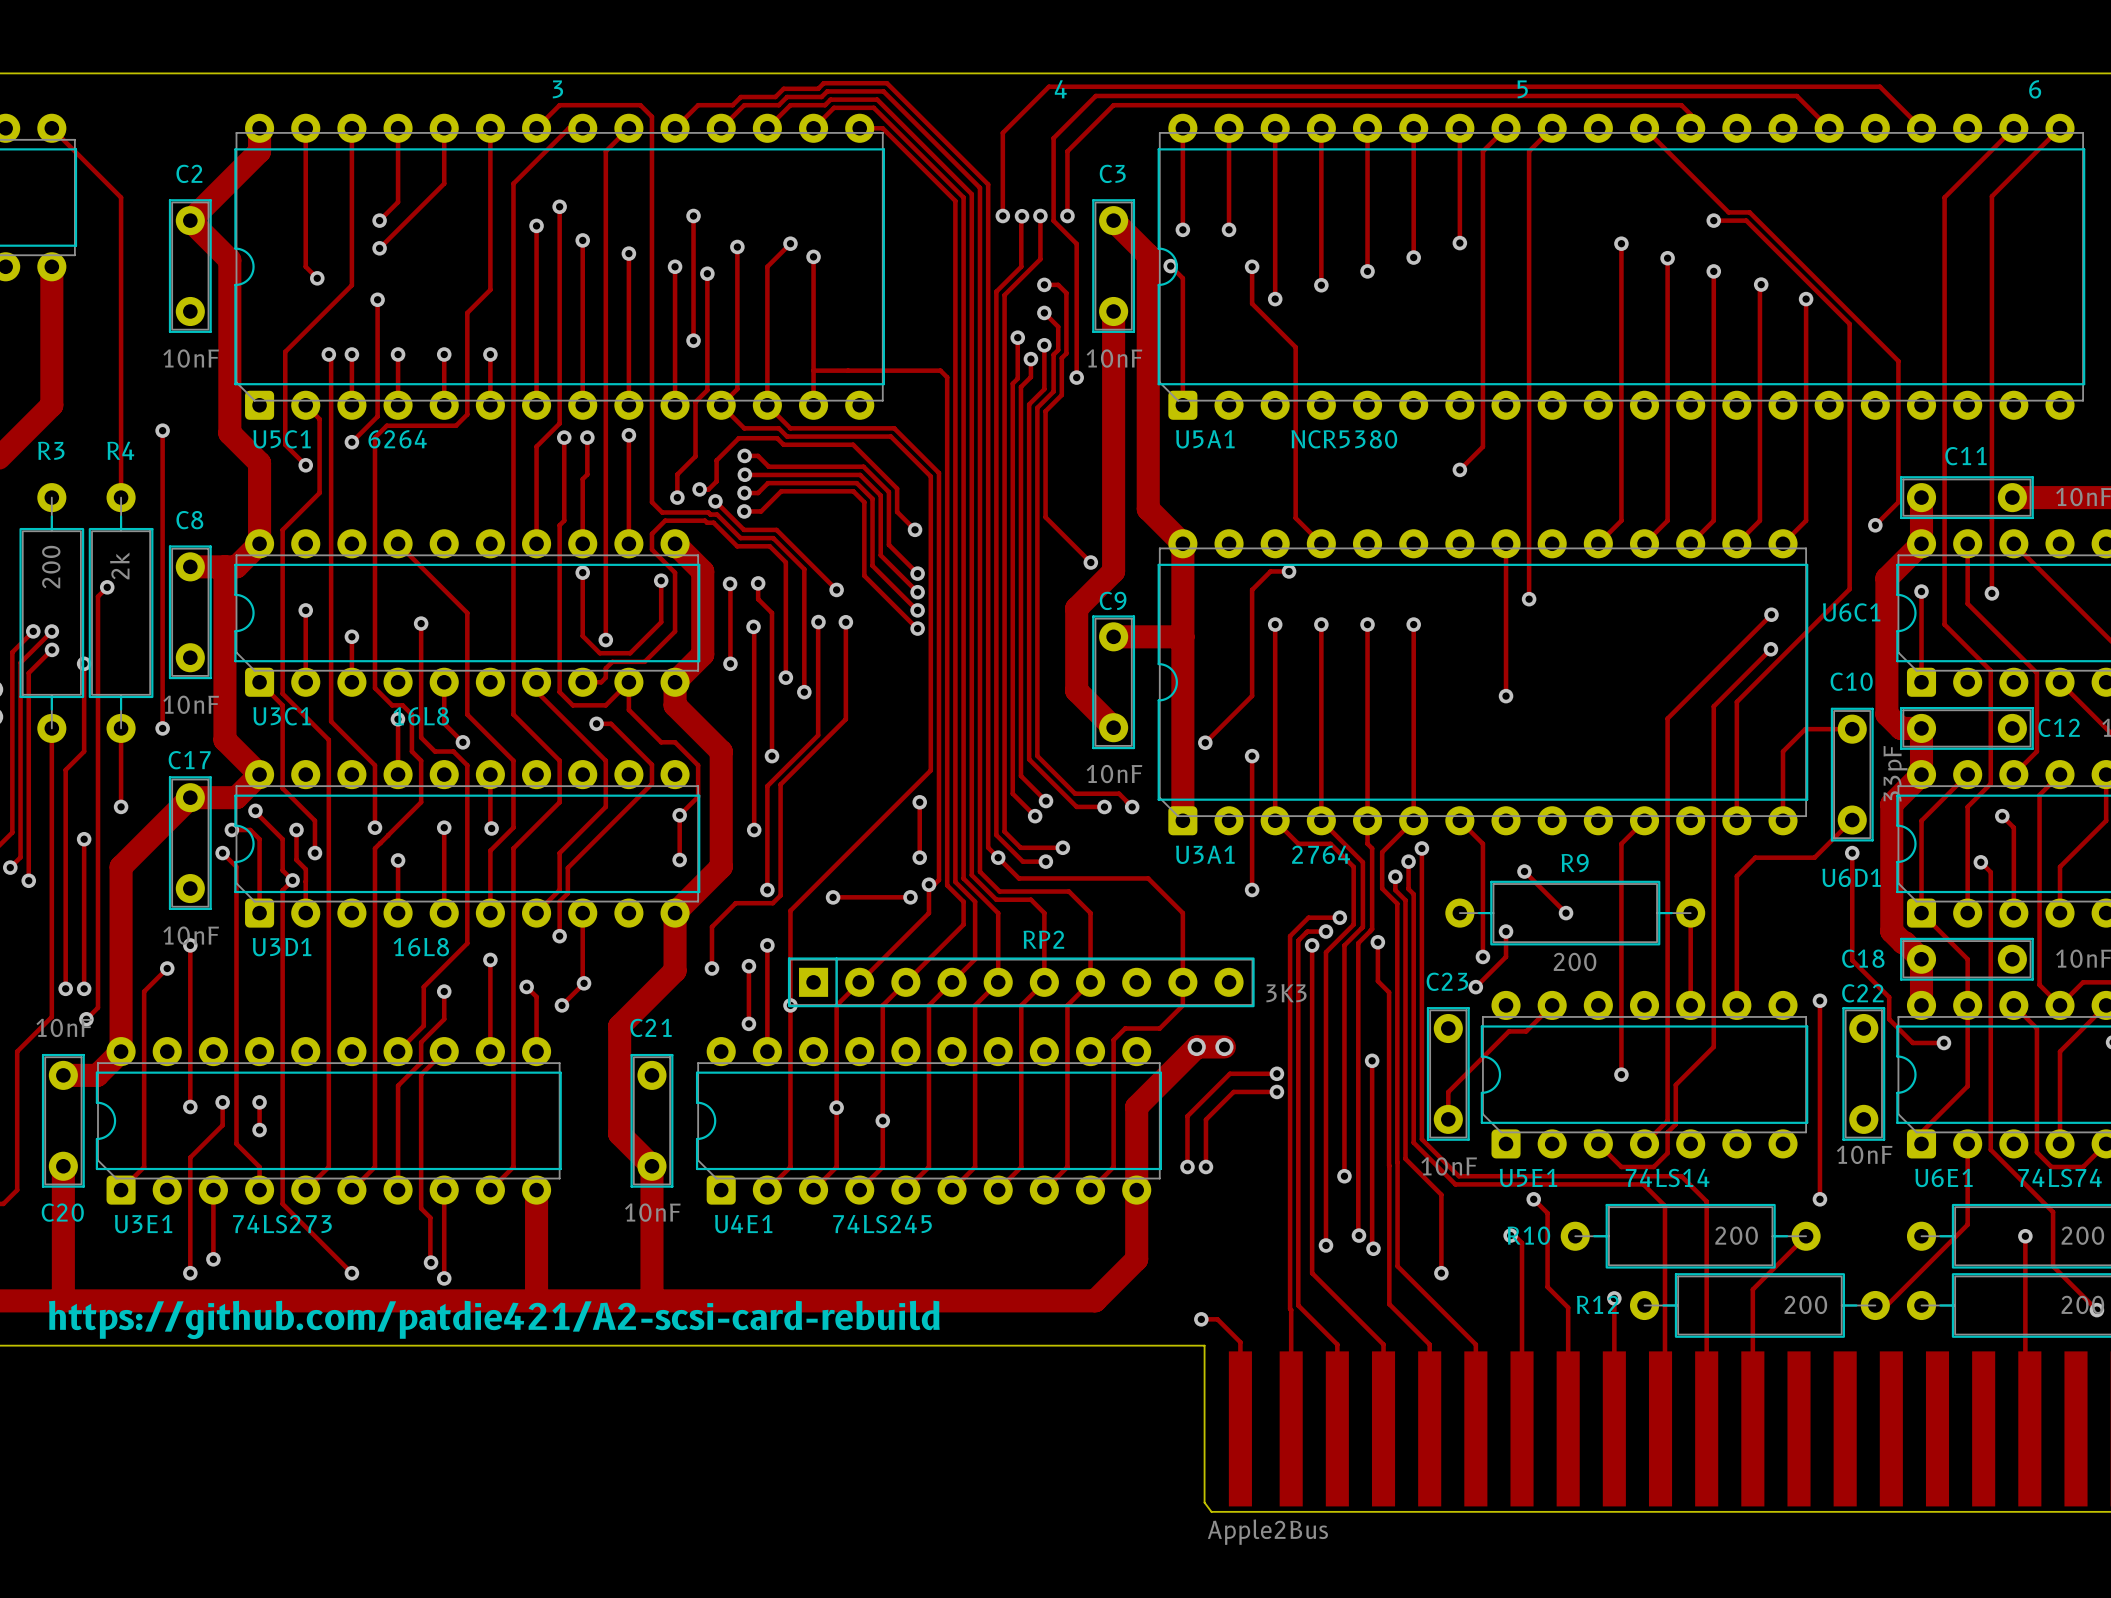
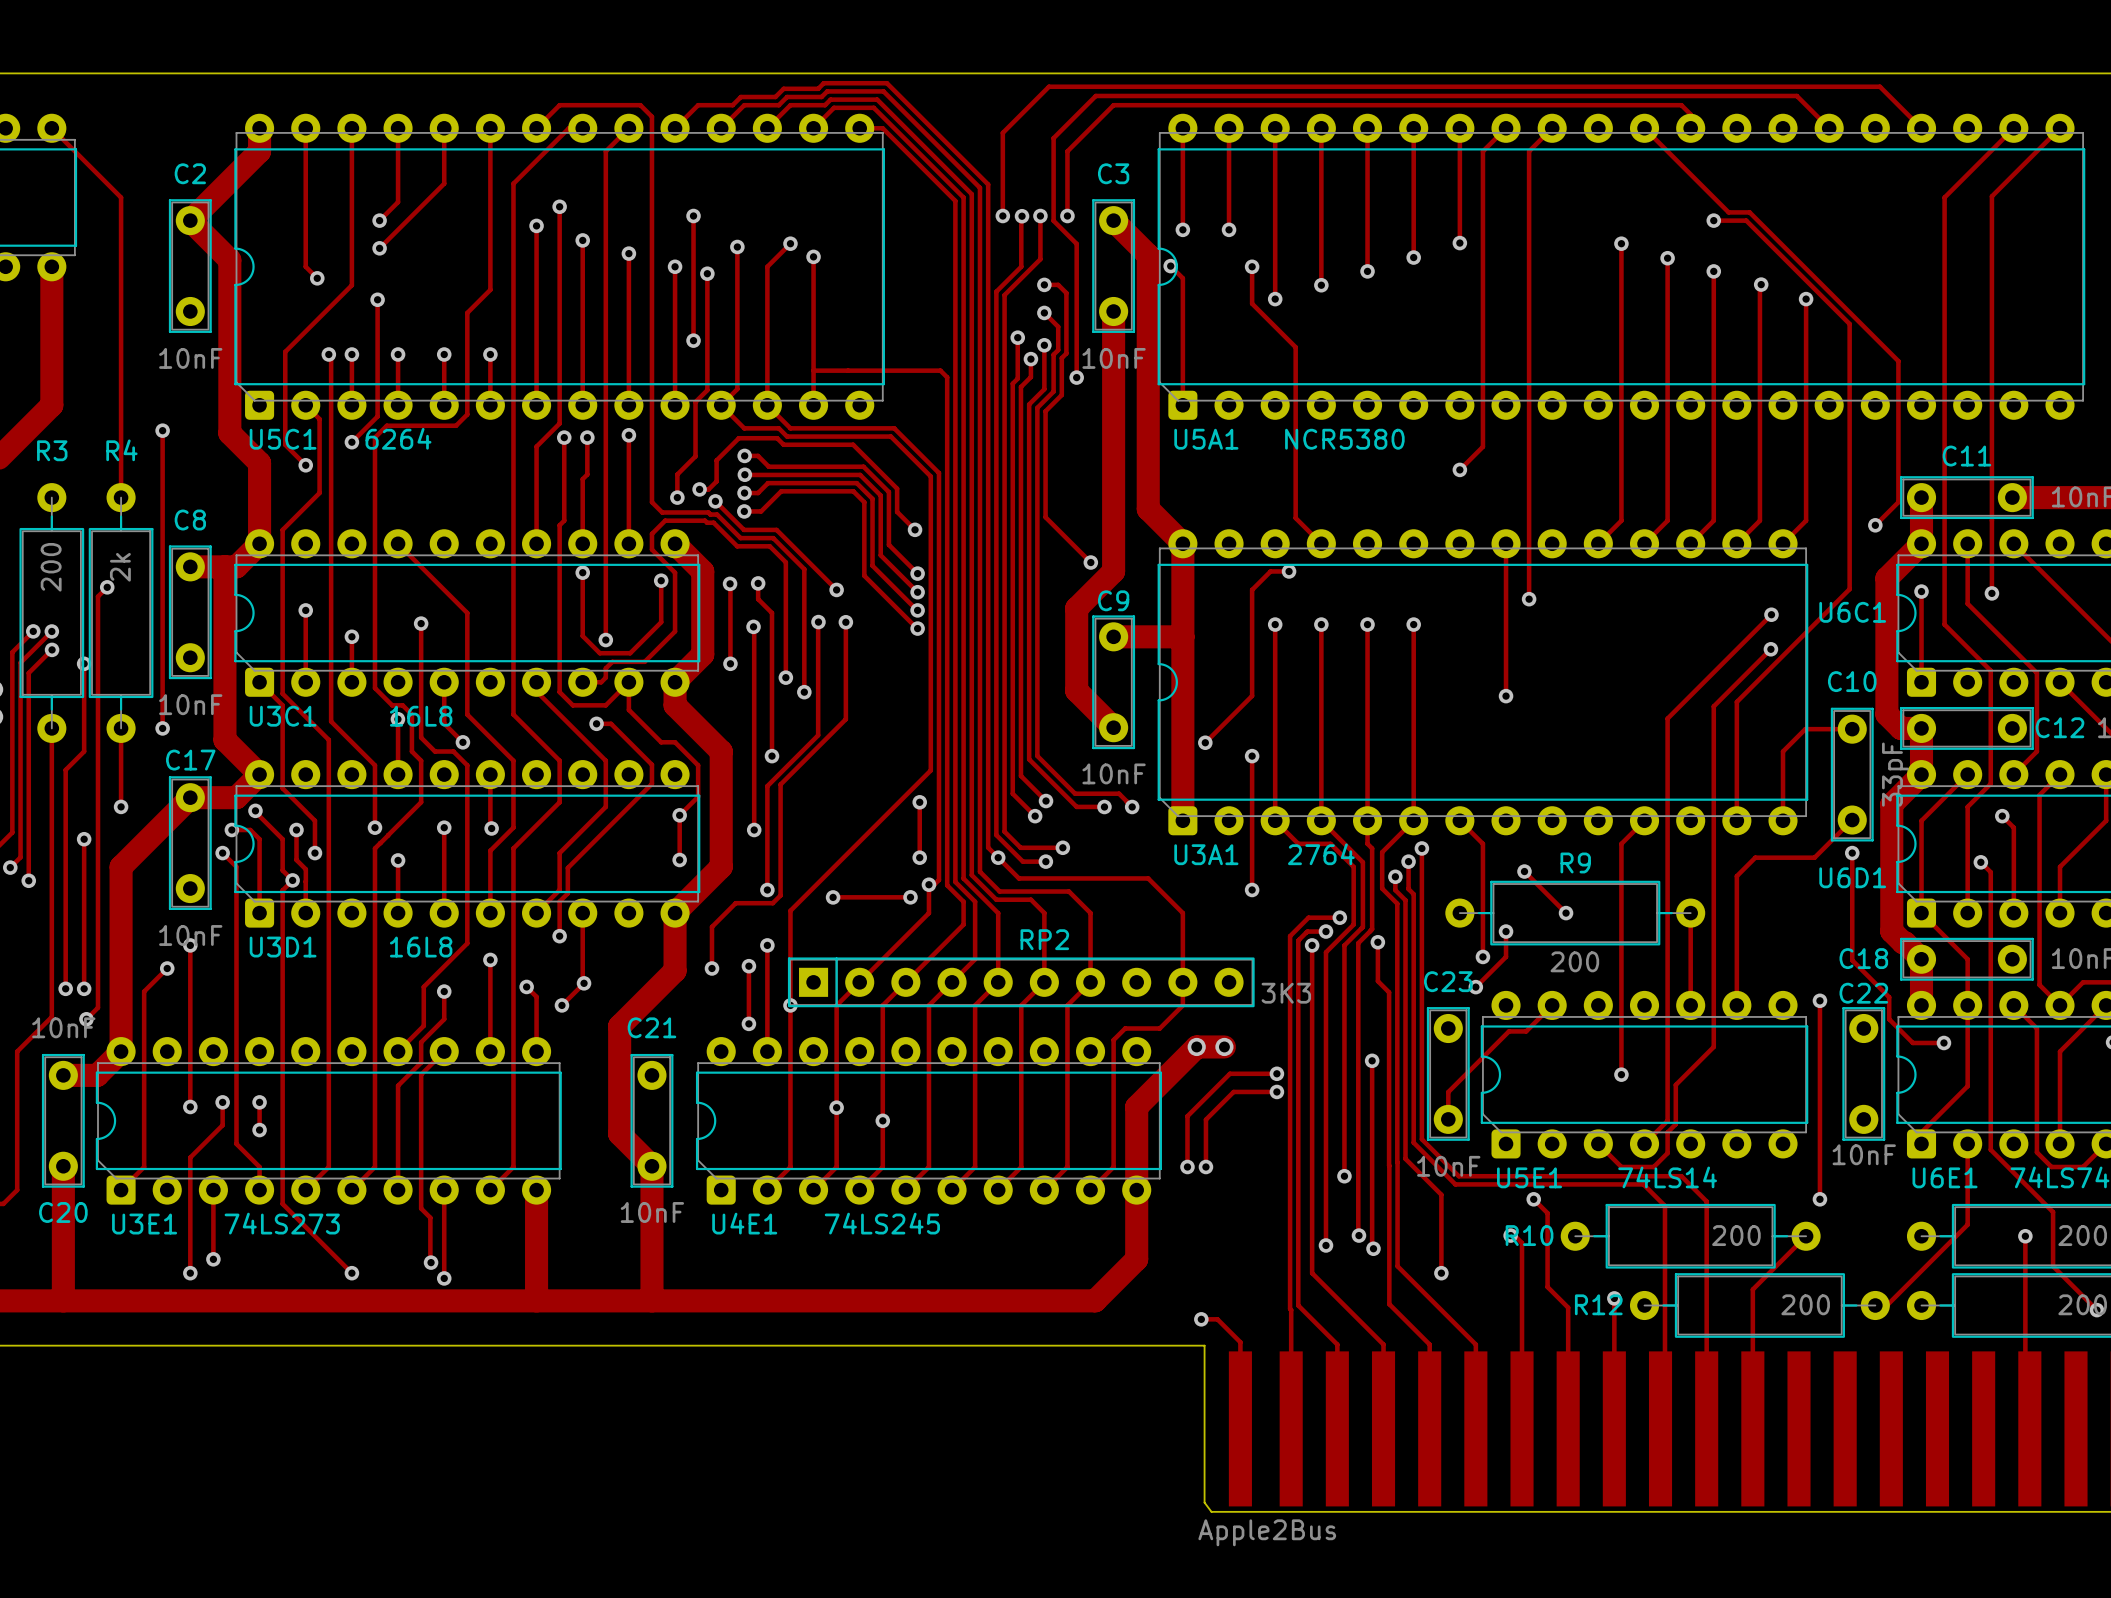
text: 3 (557, 89) -> none
text: 4 (1060, 89) -> none
text: 5 (1522, 89) -> none
text: 6 (2035, 89) -> none
text: https://github.com/patdie421/A2-scsi-card-rebuild (494, 1319) -> none

